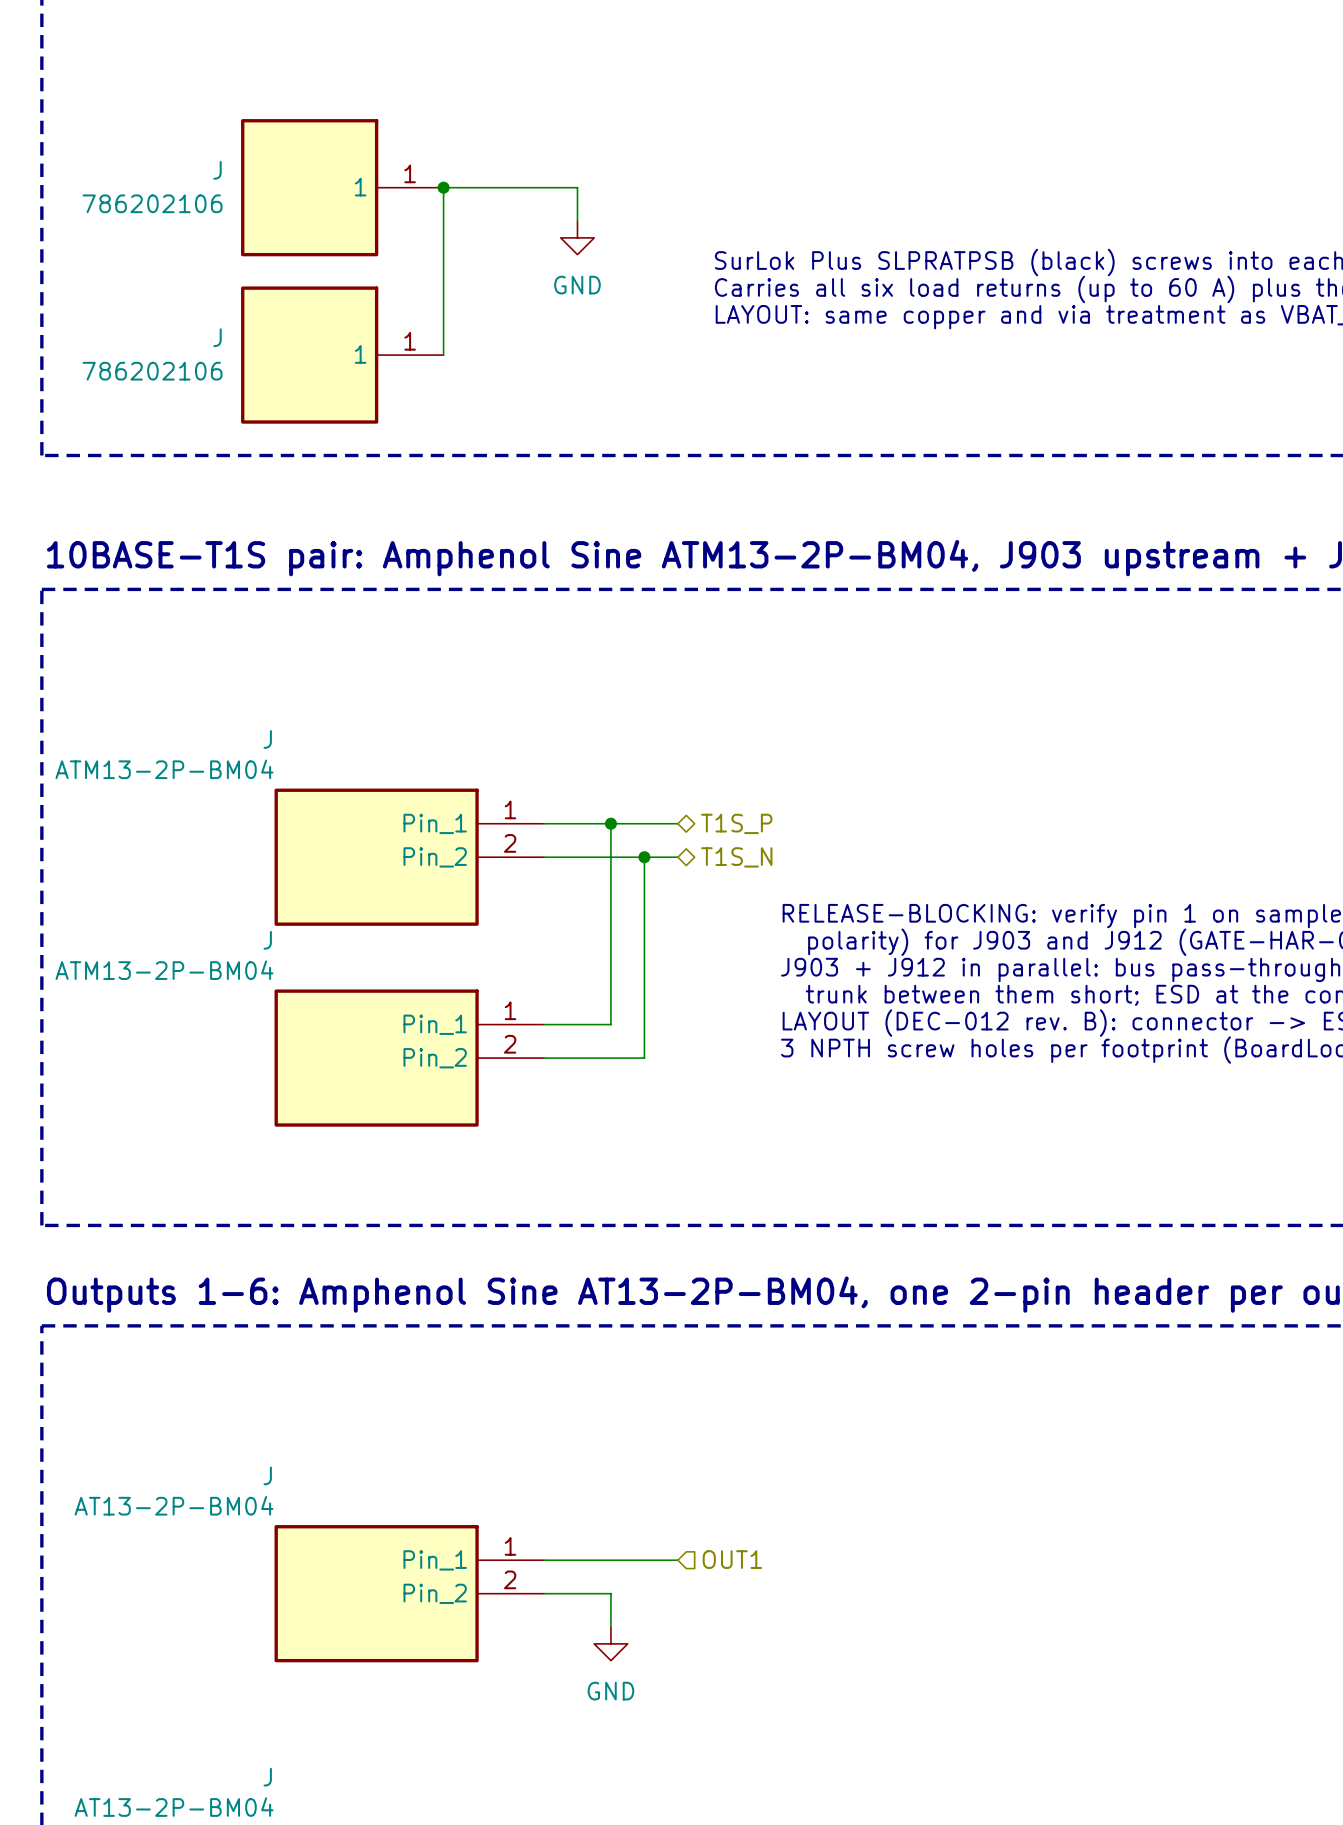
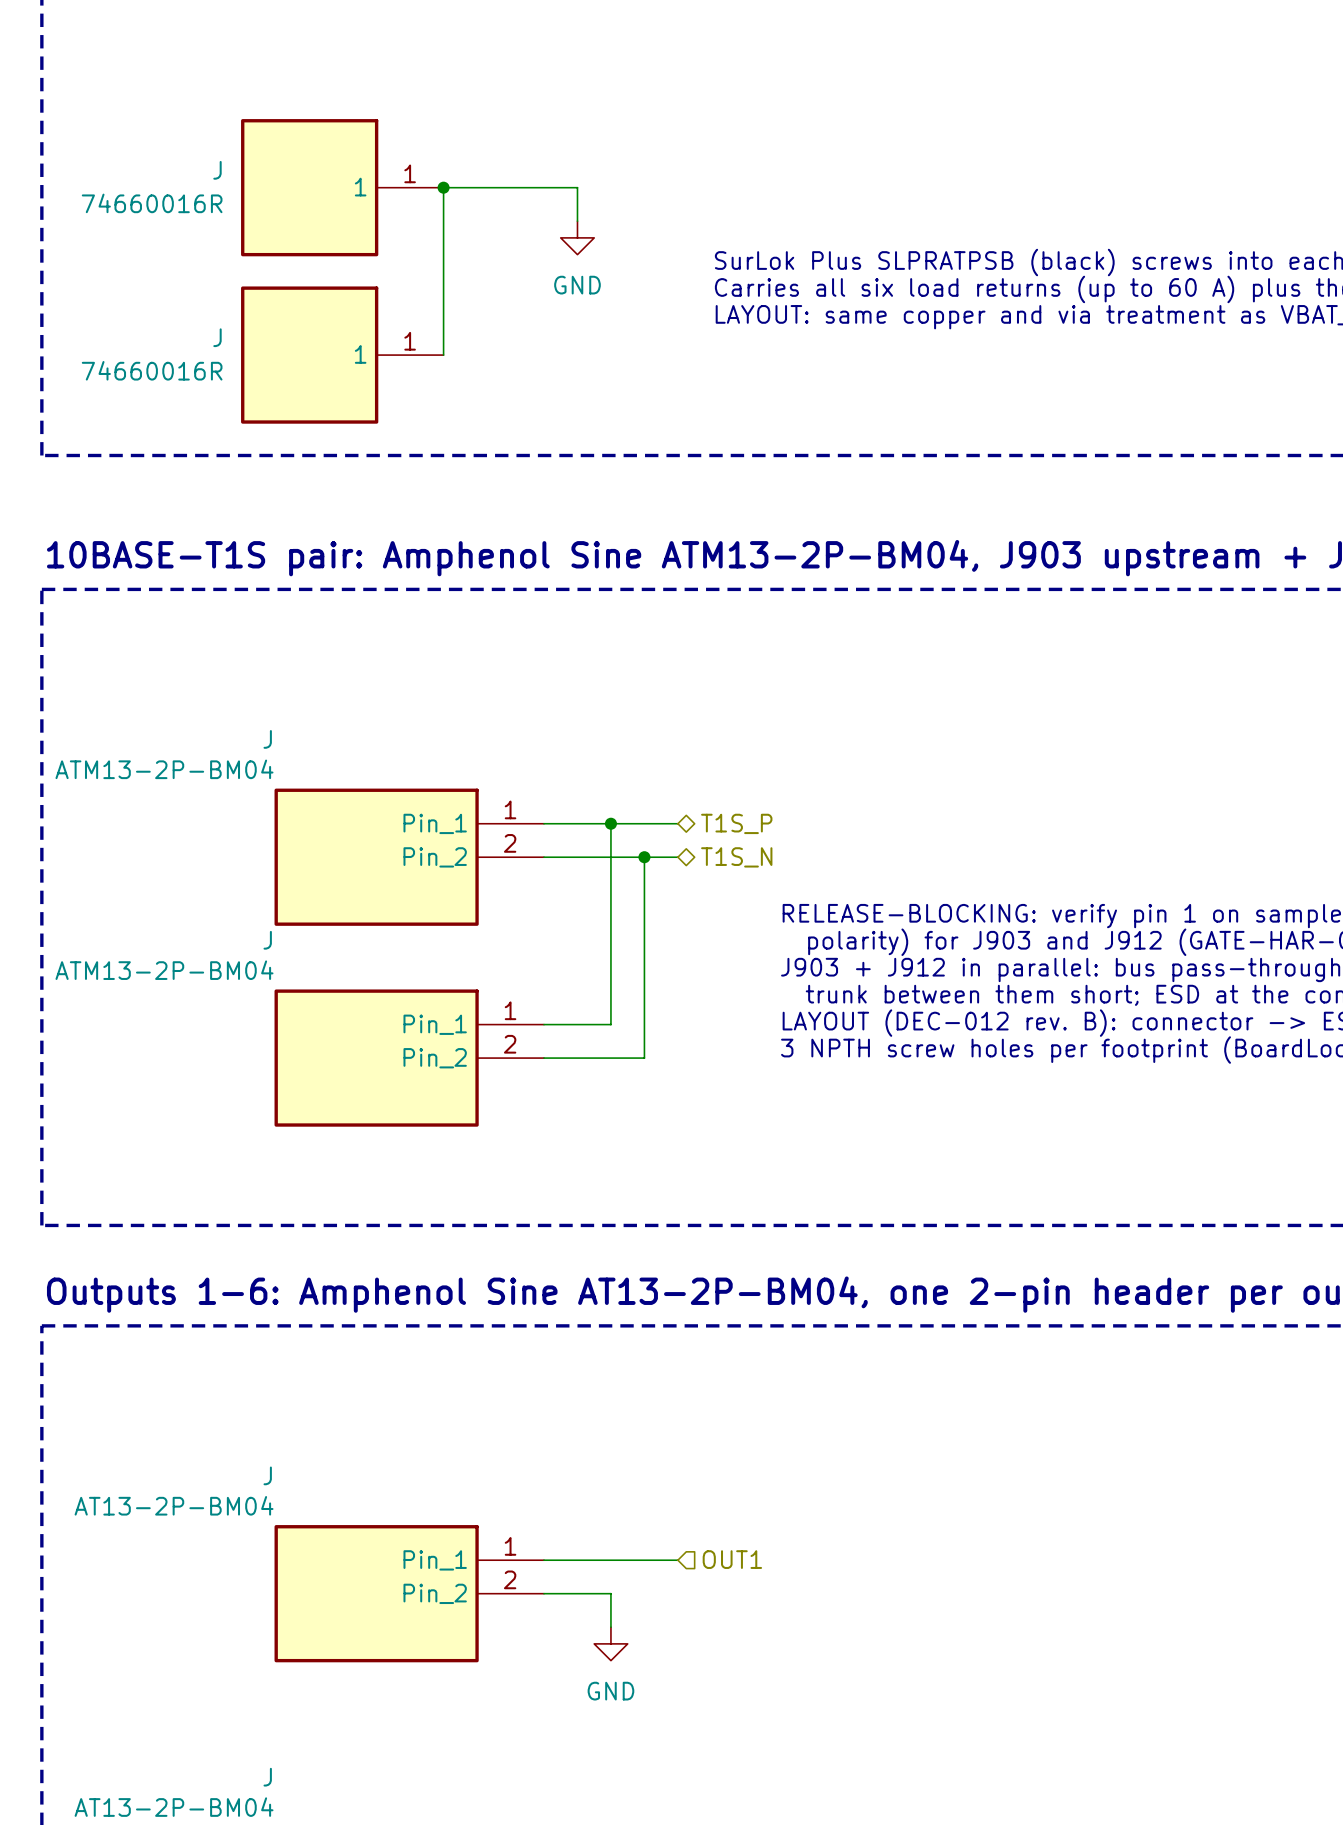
J value: 786202106 (152, 203) -> 74660016R (152, 203)
J value: 786202106 (152, 371) -> 74660016R (152, 370)

